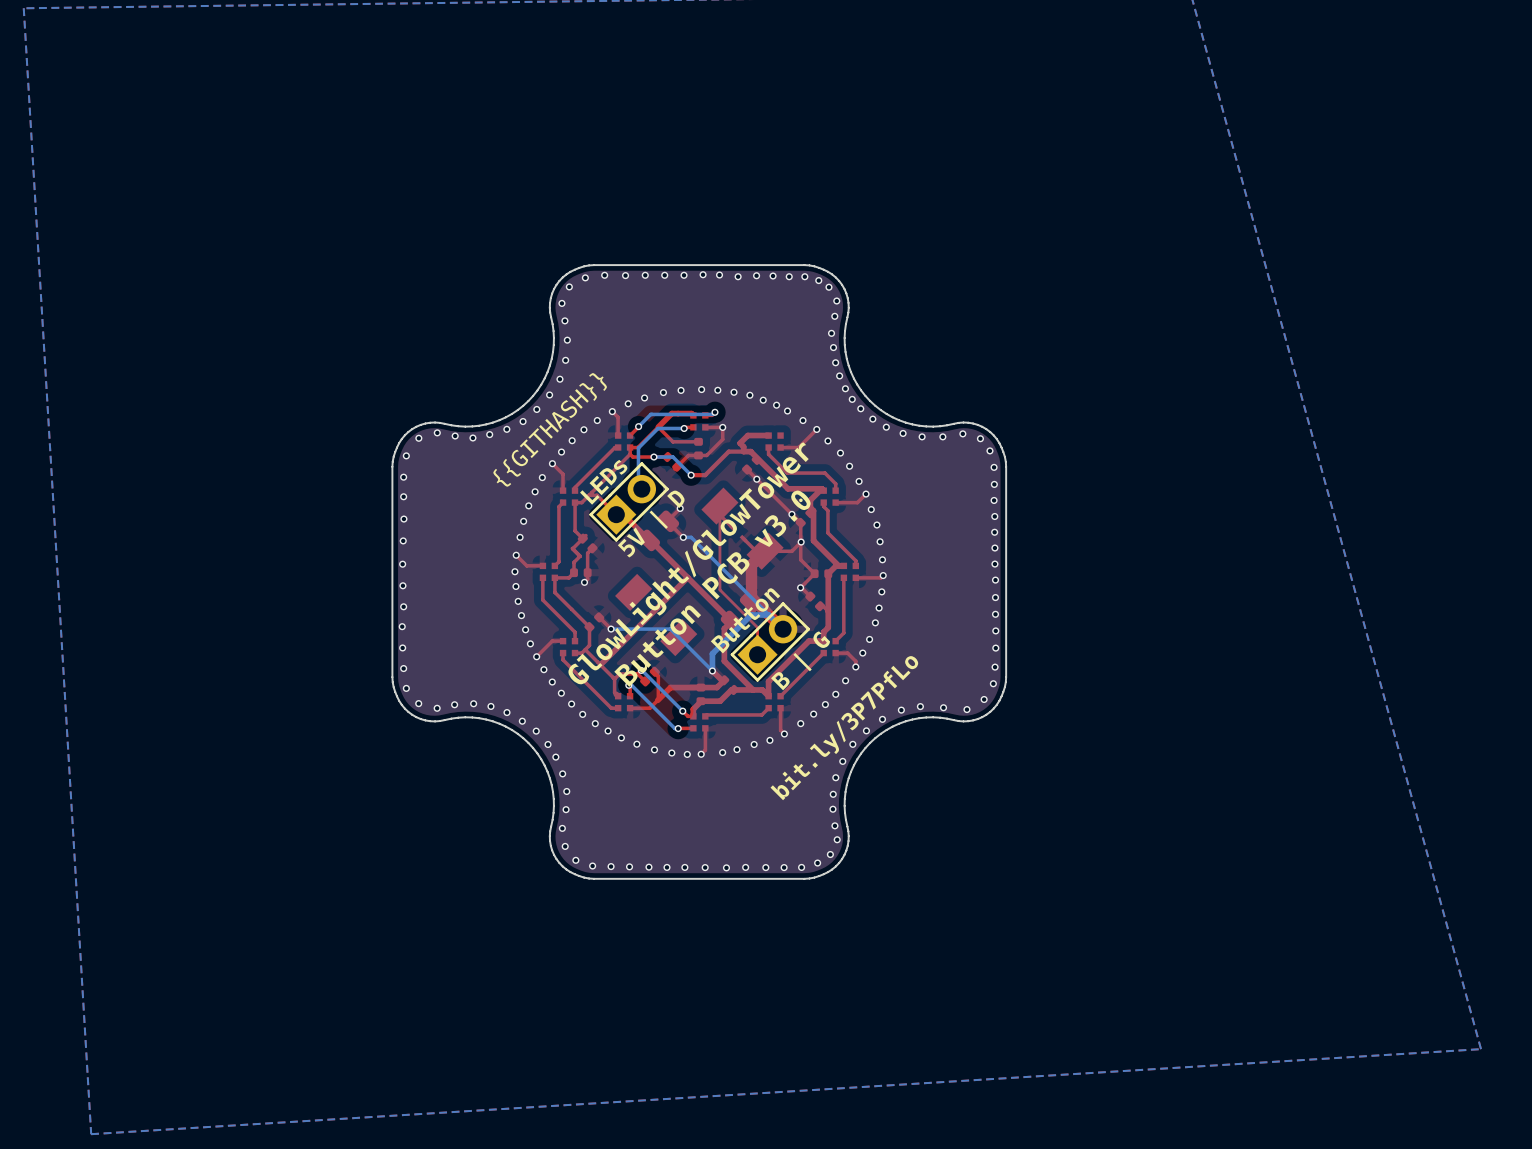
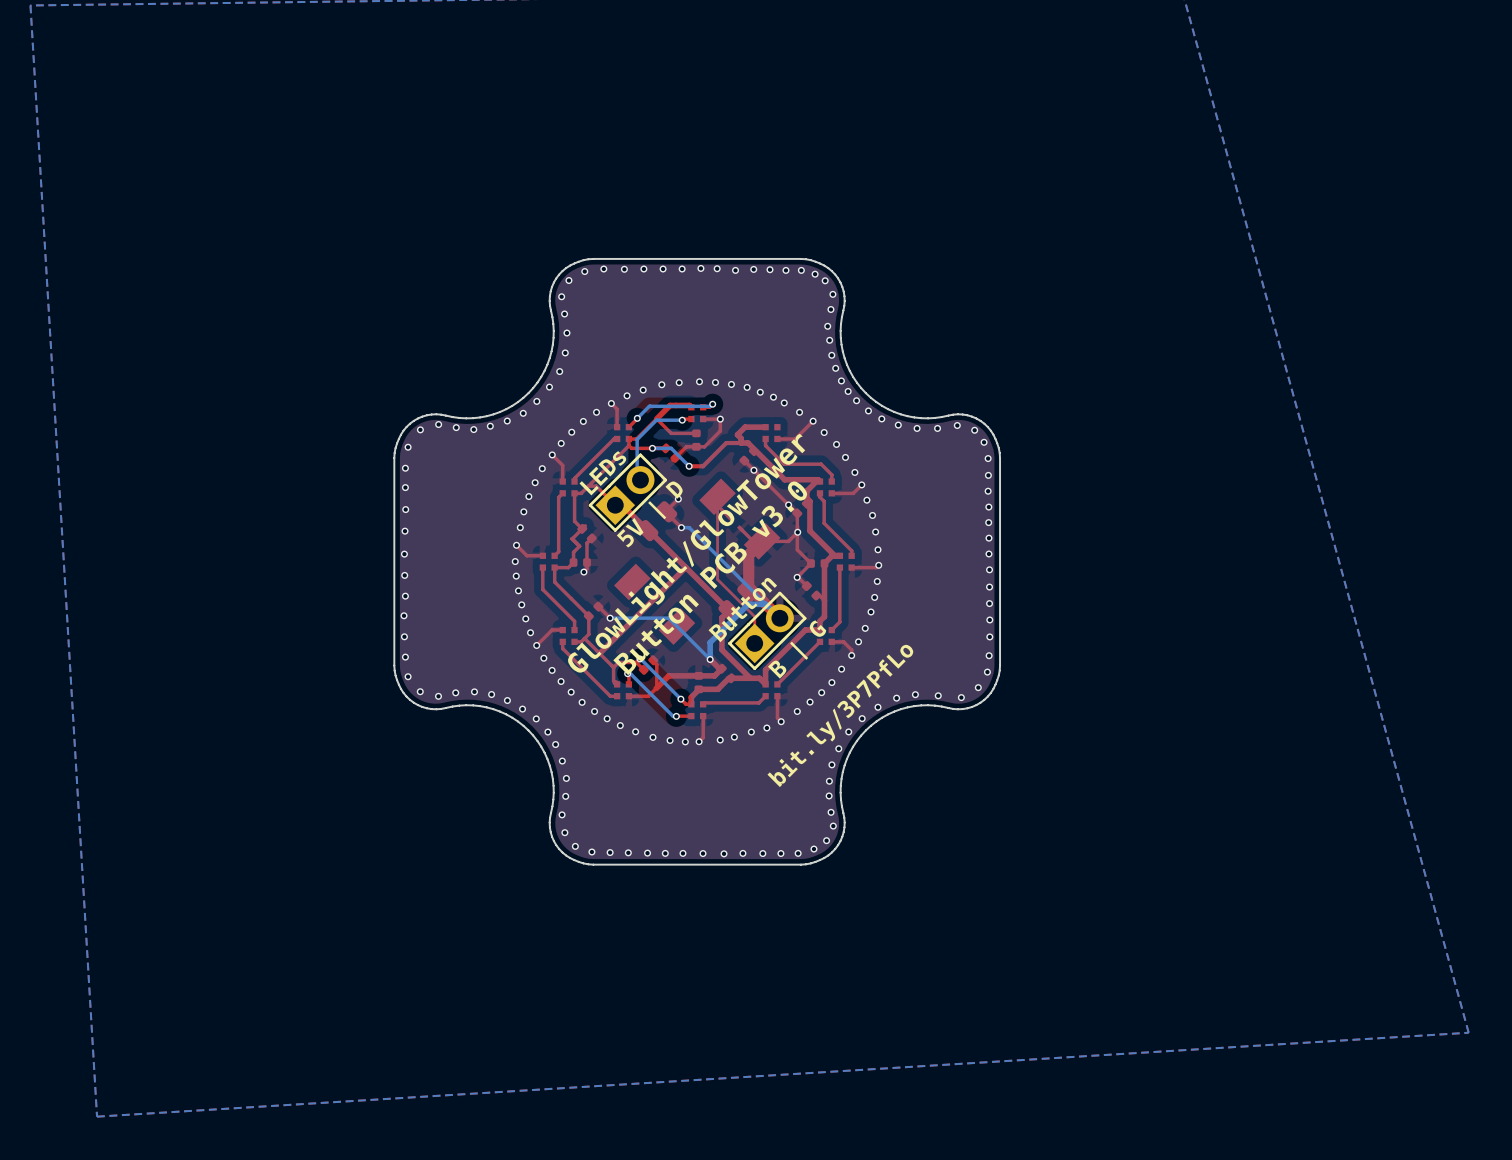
text: {{GITHASH}} (550, 429) -> none

